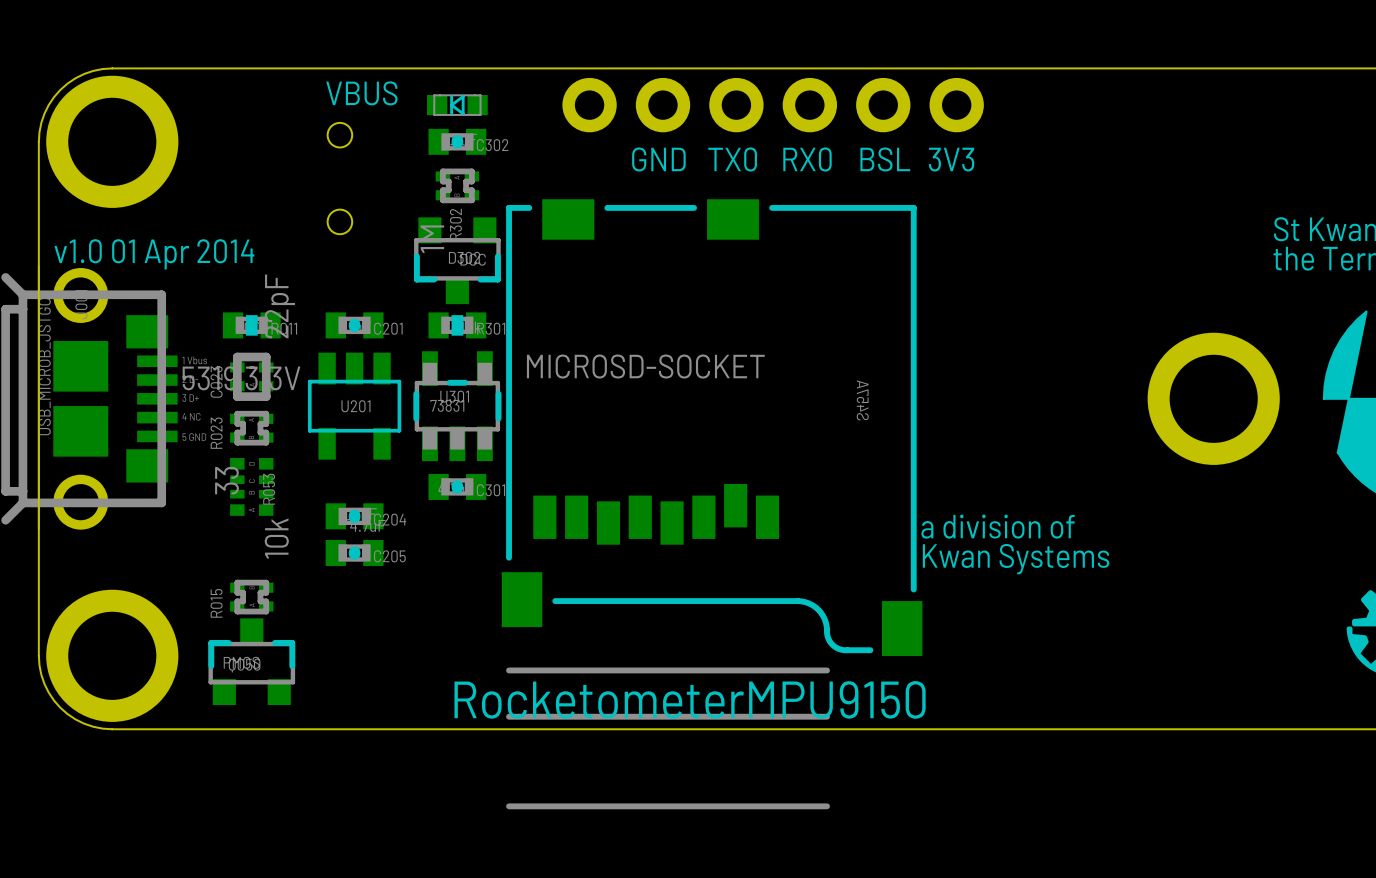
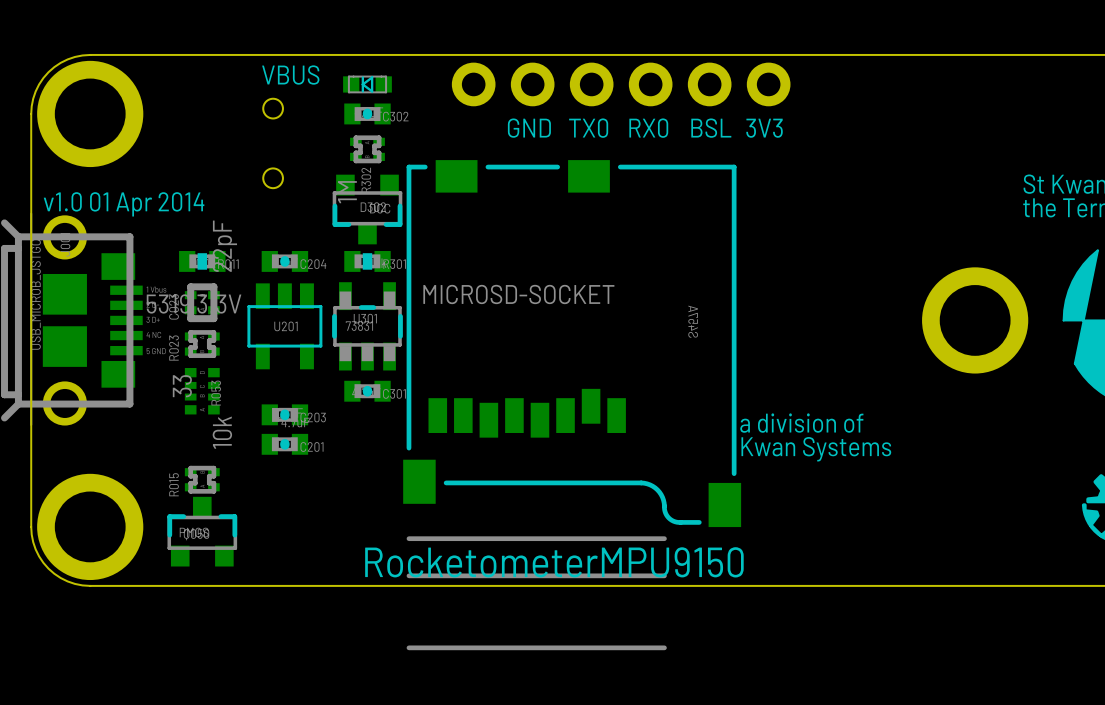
C201 name: C201 (388, 328) -> C204 (313, 264)
C204 name: C204 (390, 519) -> C203 (313, 417)
C205 name: C205 (389, 556) -> C201 (312, 446)

